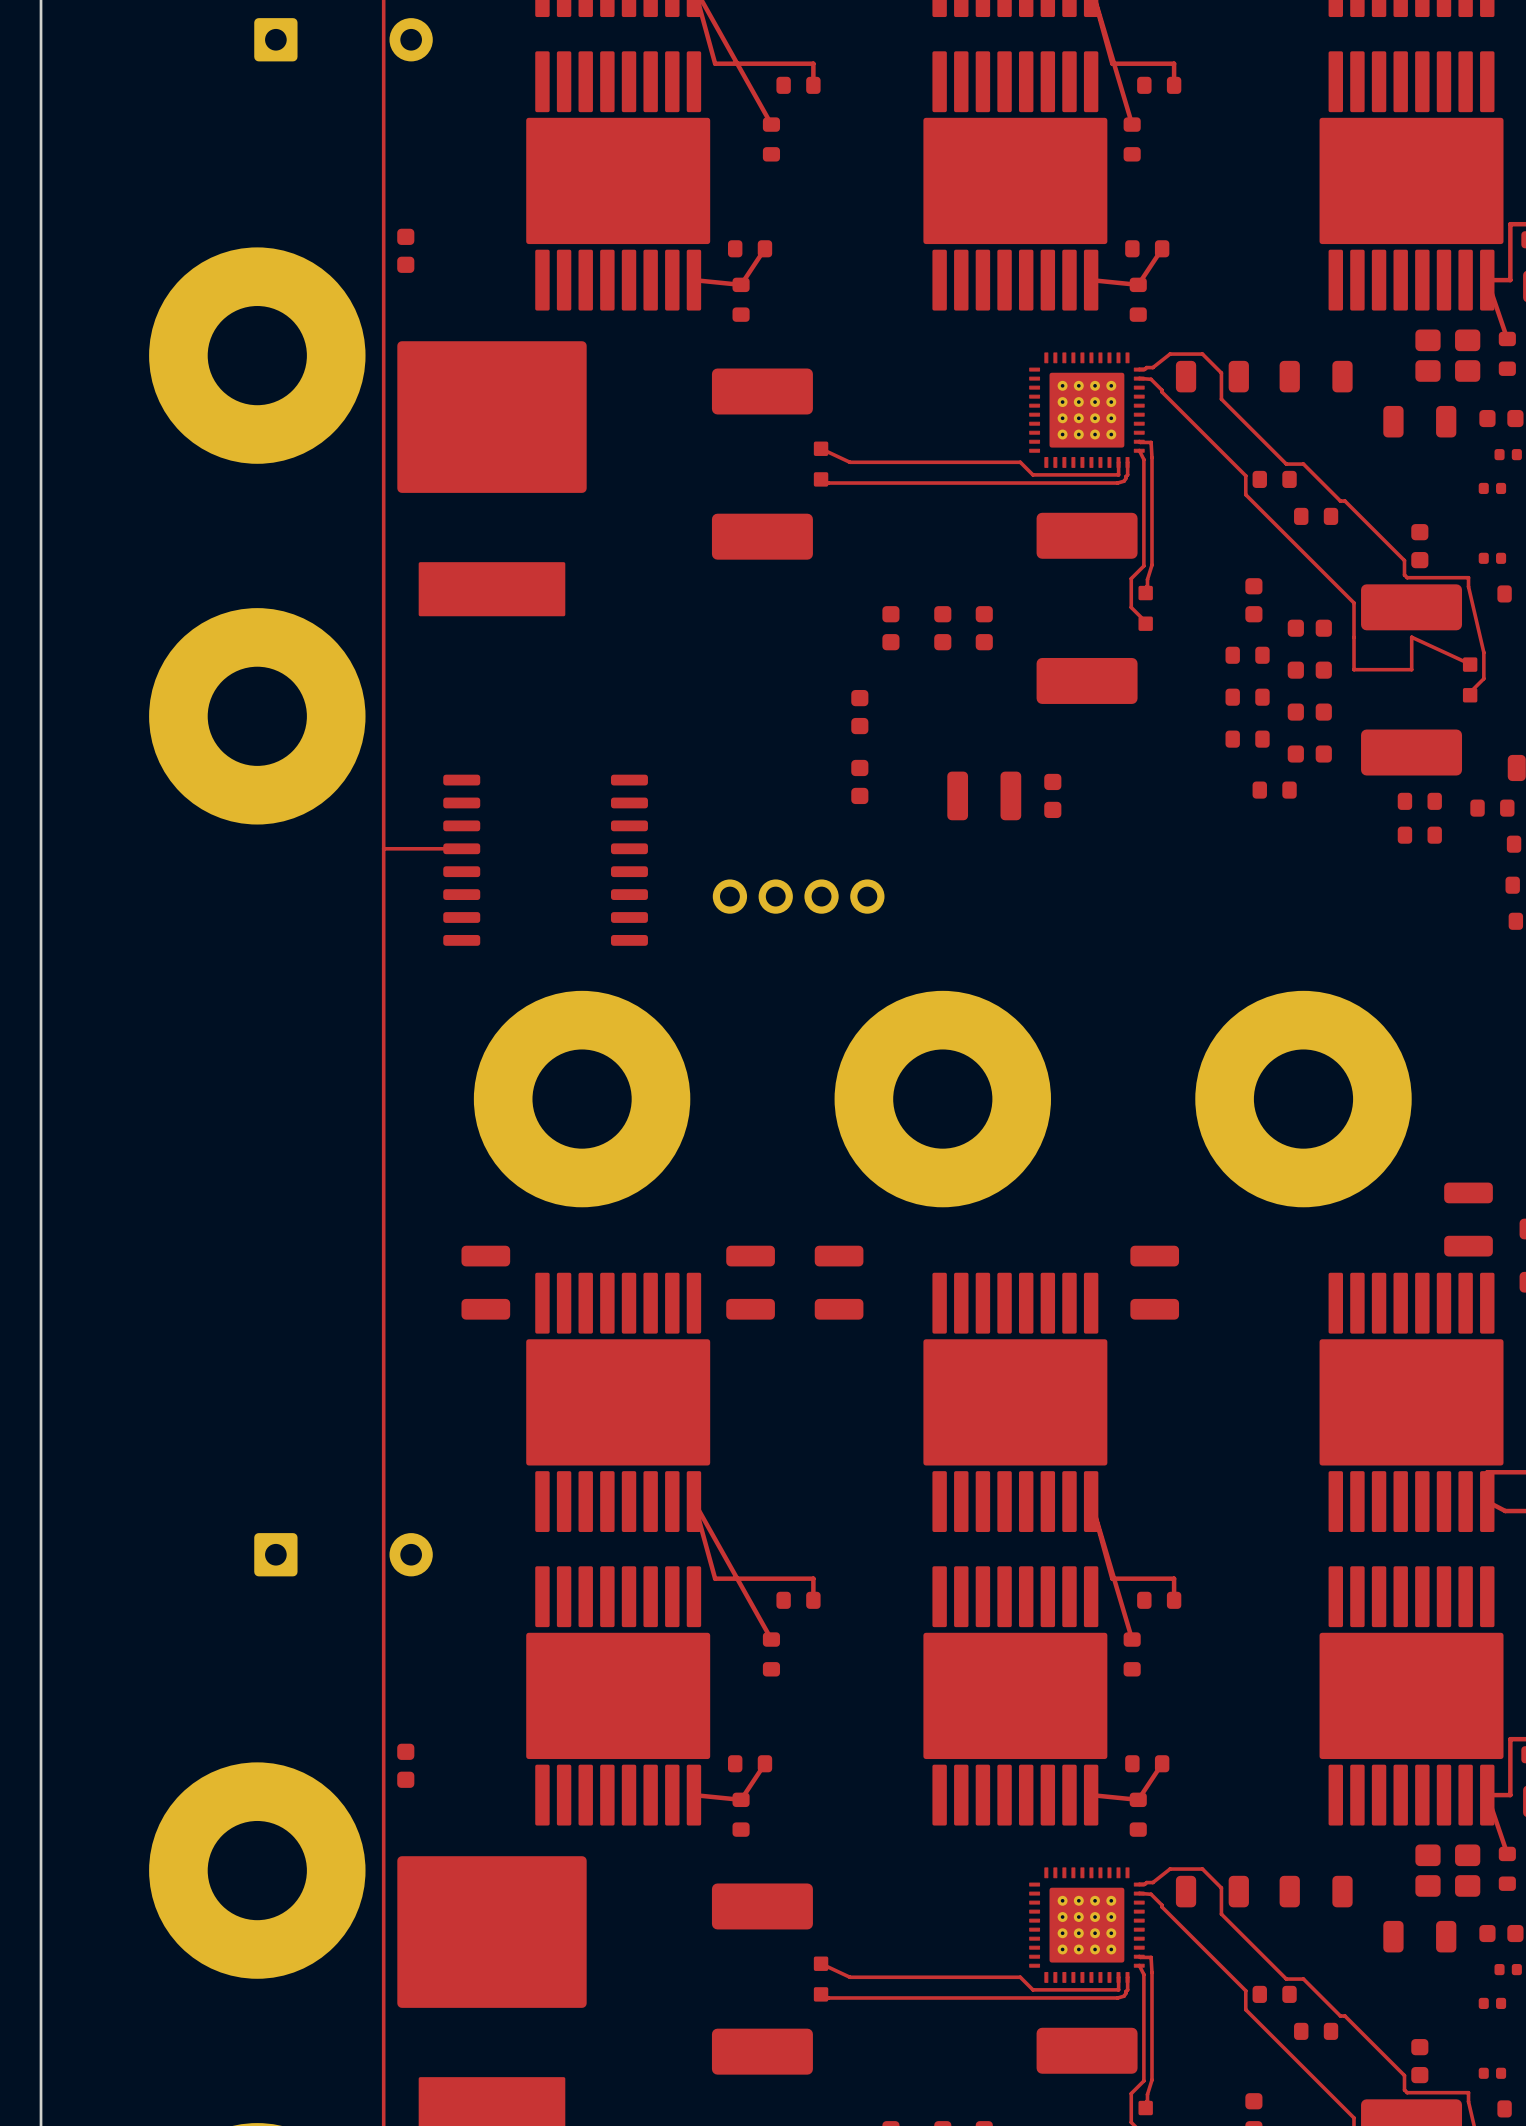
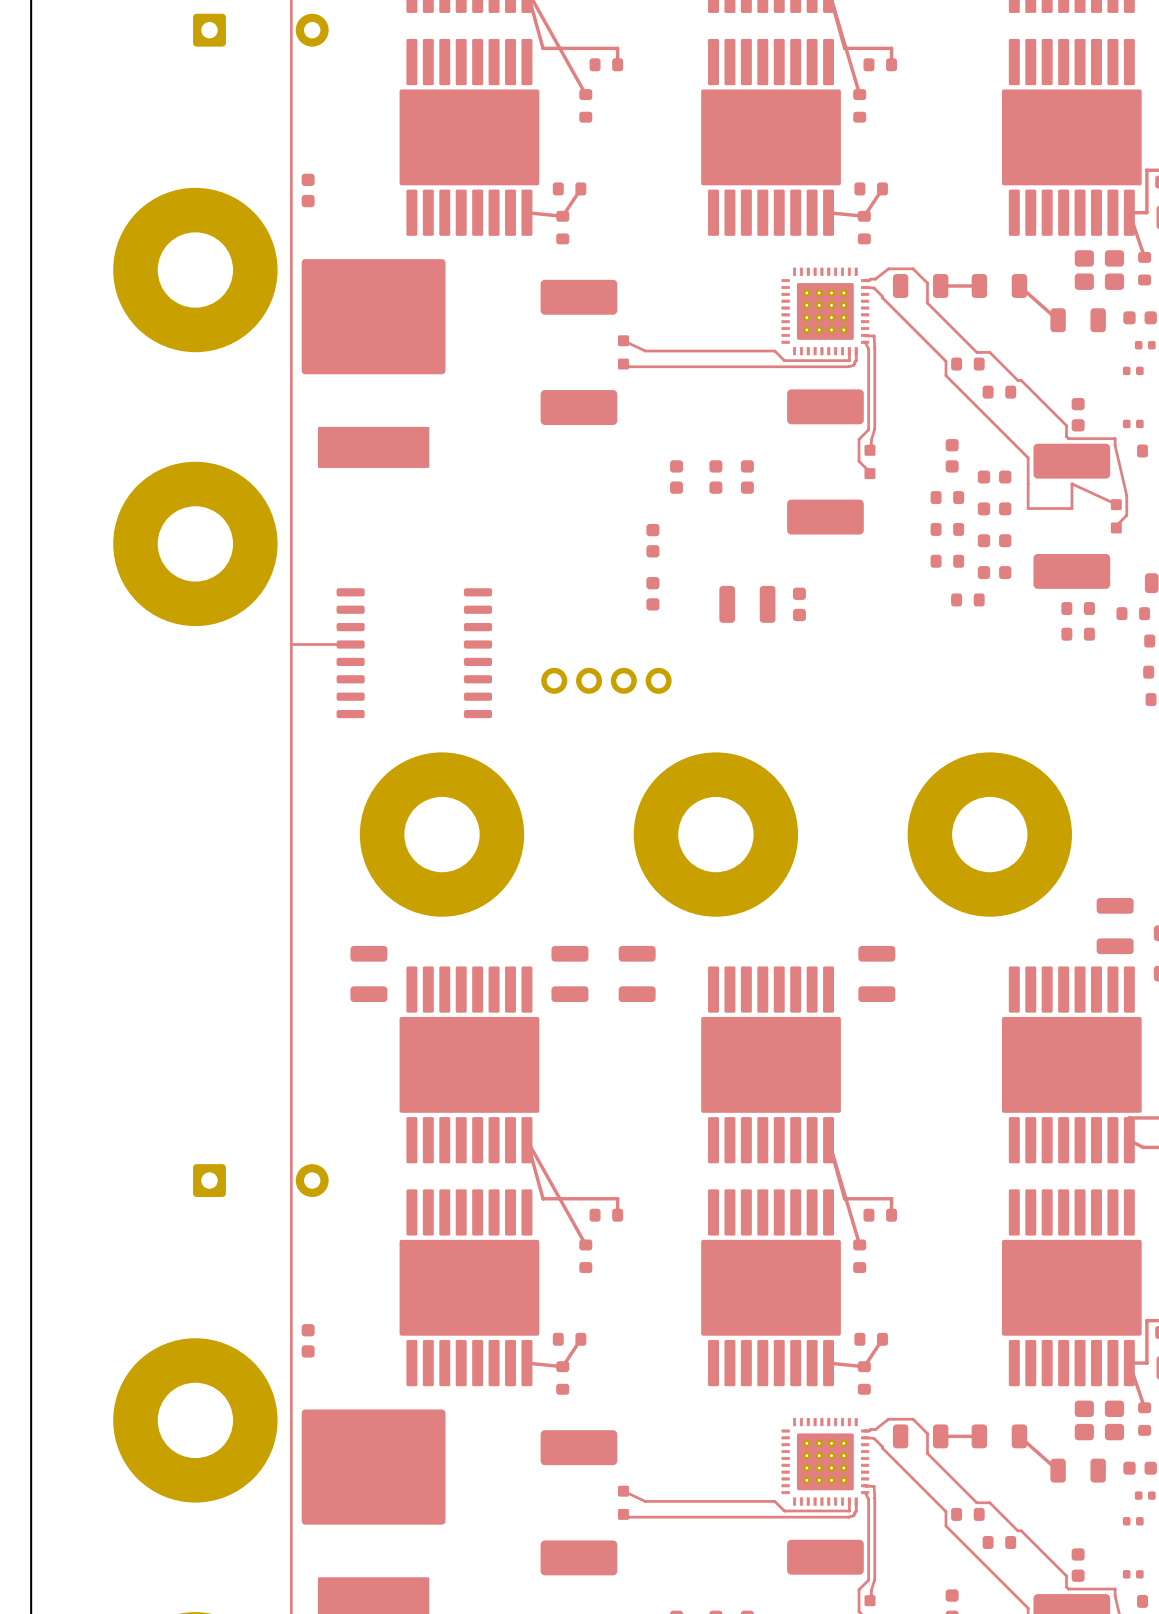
top track: none -> (940, 285) (979, 285)
top track: none -> (1019, 285) (1058, 320)
top track: none -> (940, 1436) (979, 1436)
top track: none -> (1019, 1436) (1058, 1470)

